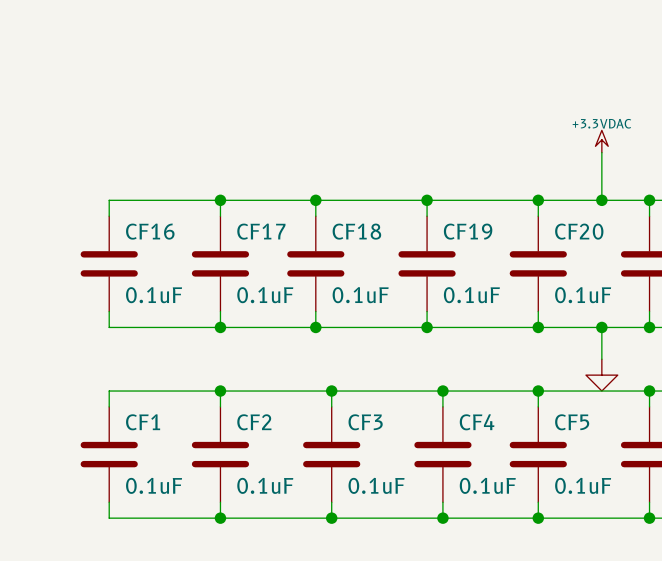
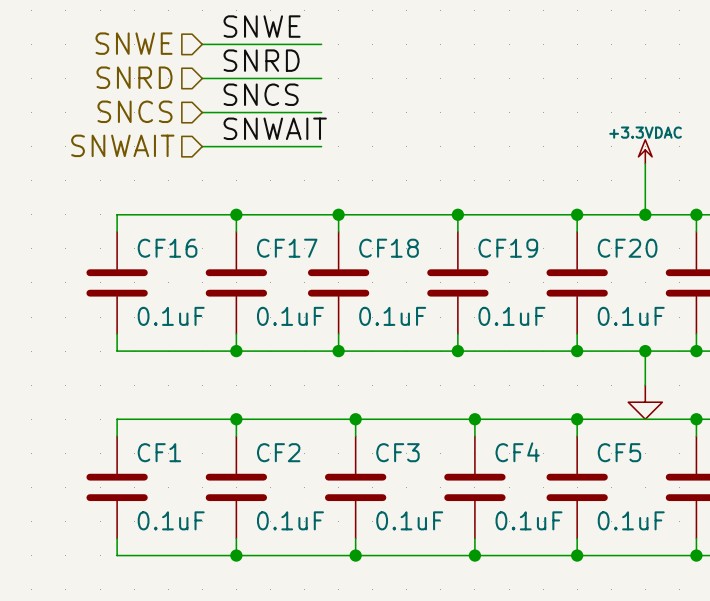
label: none -> SNWE (262, 26)
hierarchical label: none -> SNWE (134, 43)
wire: none -> (202, 44) (321, 44)
label: none -> SNRD (261, 60)
hierarchical label: none -> SNRD (134, 77)
wire: none -> (202, 78) (321, 78)
label: none -> SNCS (261, 94)
hierarchical label: none -> SNCS (134, 111)
wire: none -> (202, 112) (321, 112)
label: none -> SNWAIT (275, 128)
hierarchical label: none -> SNWAIT (122, 145)
wire: none -> (202, 146) (321, 146)

